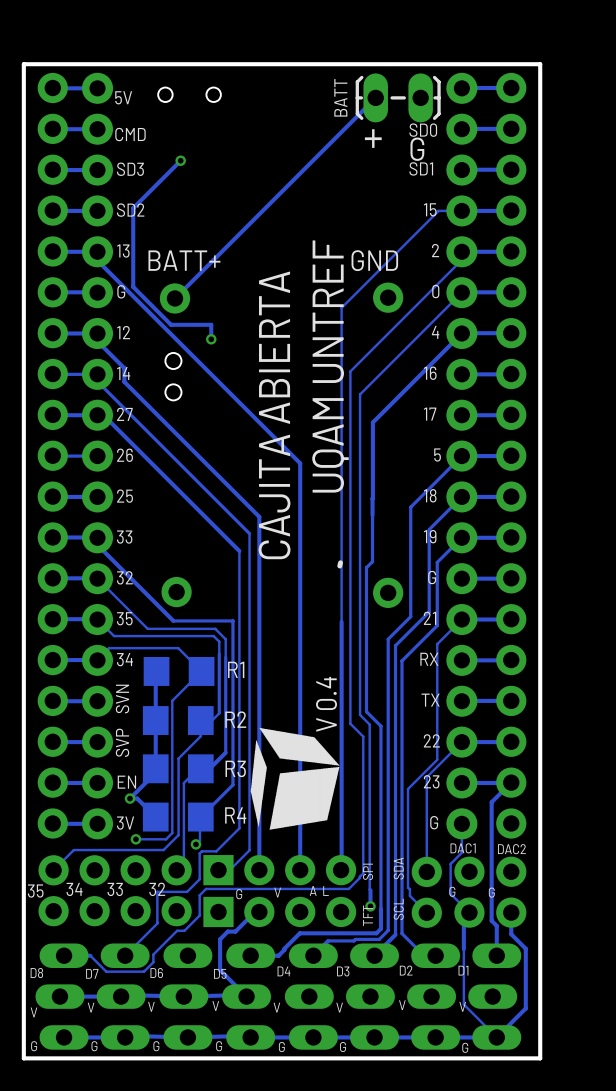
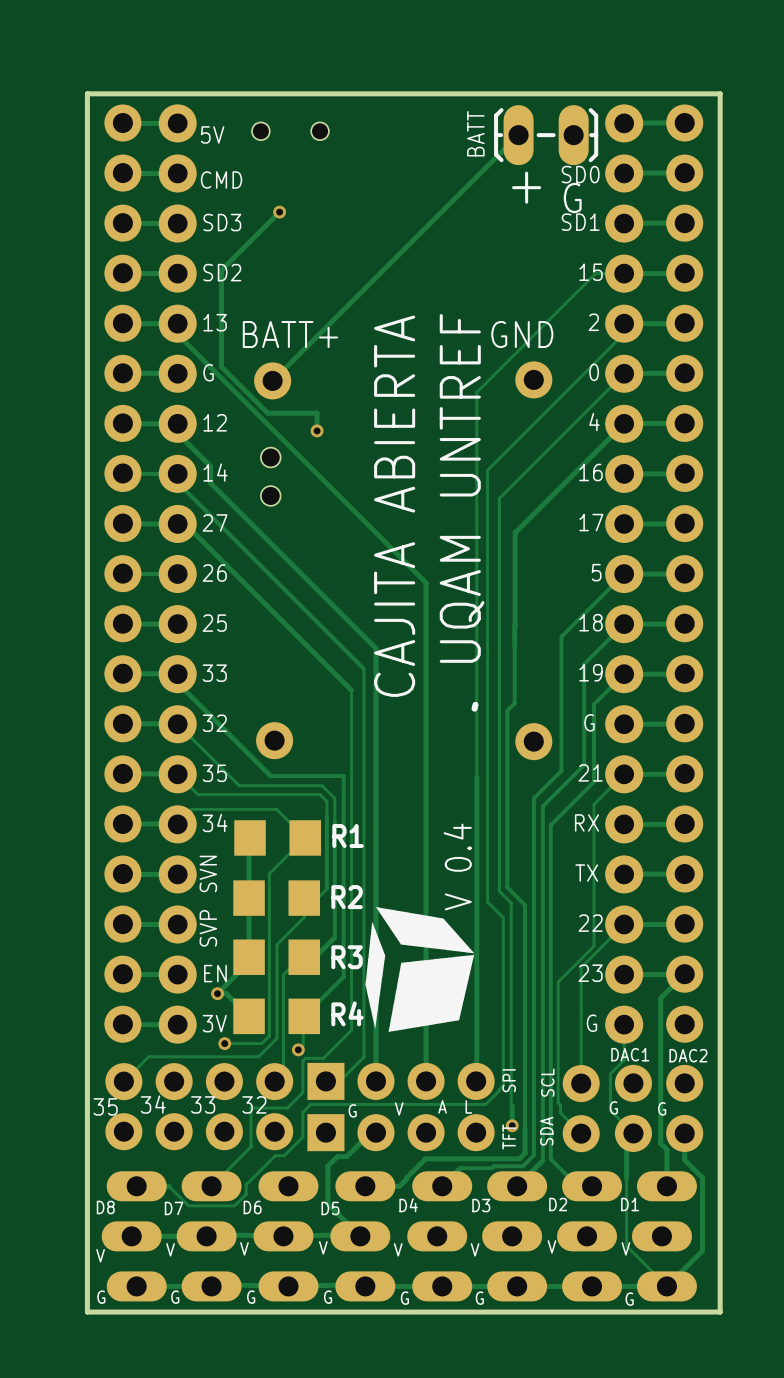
text: SDA (398, 868) -> SCL (547, 1082)
text: SCL (398, 909) -> SDA (546, 1131)

